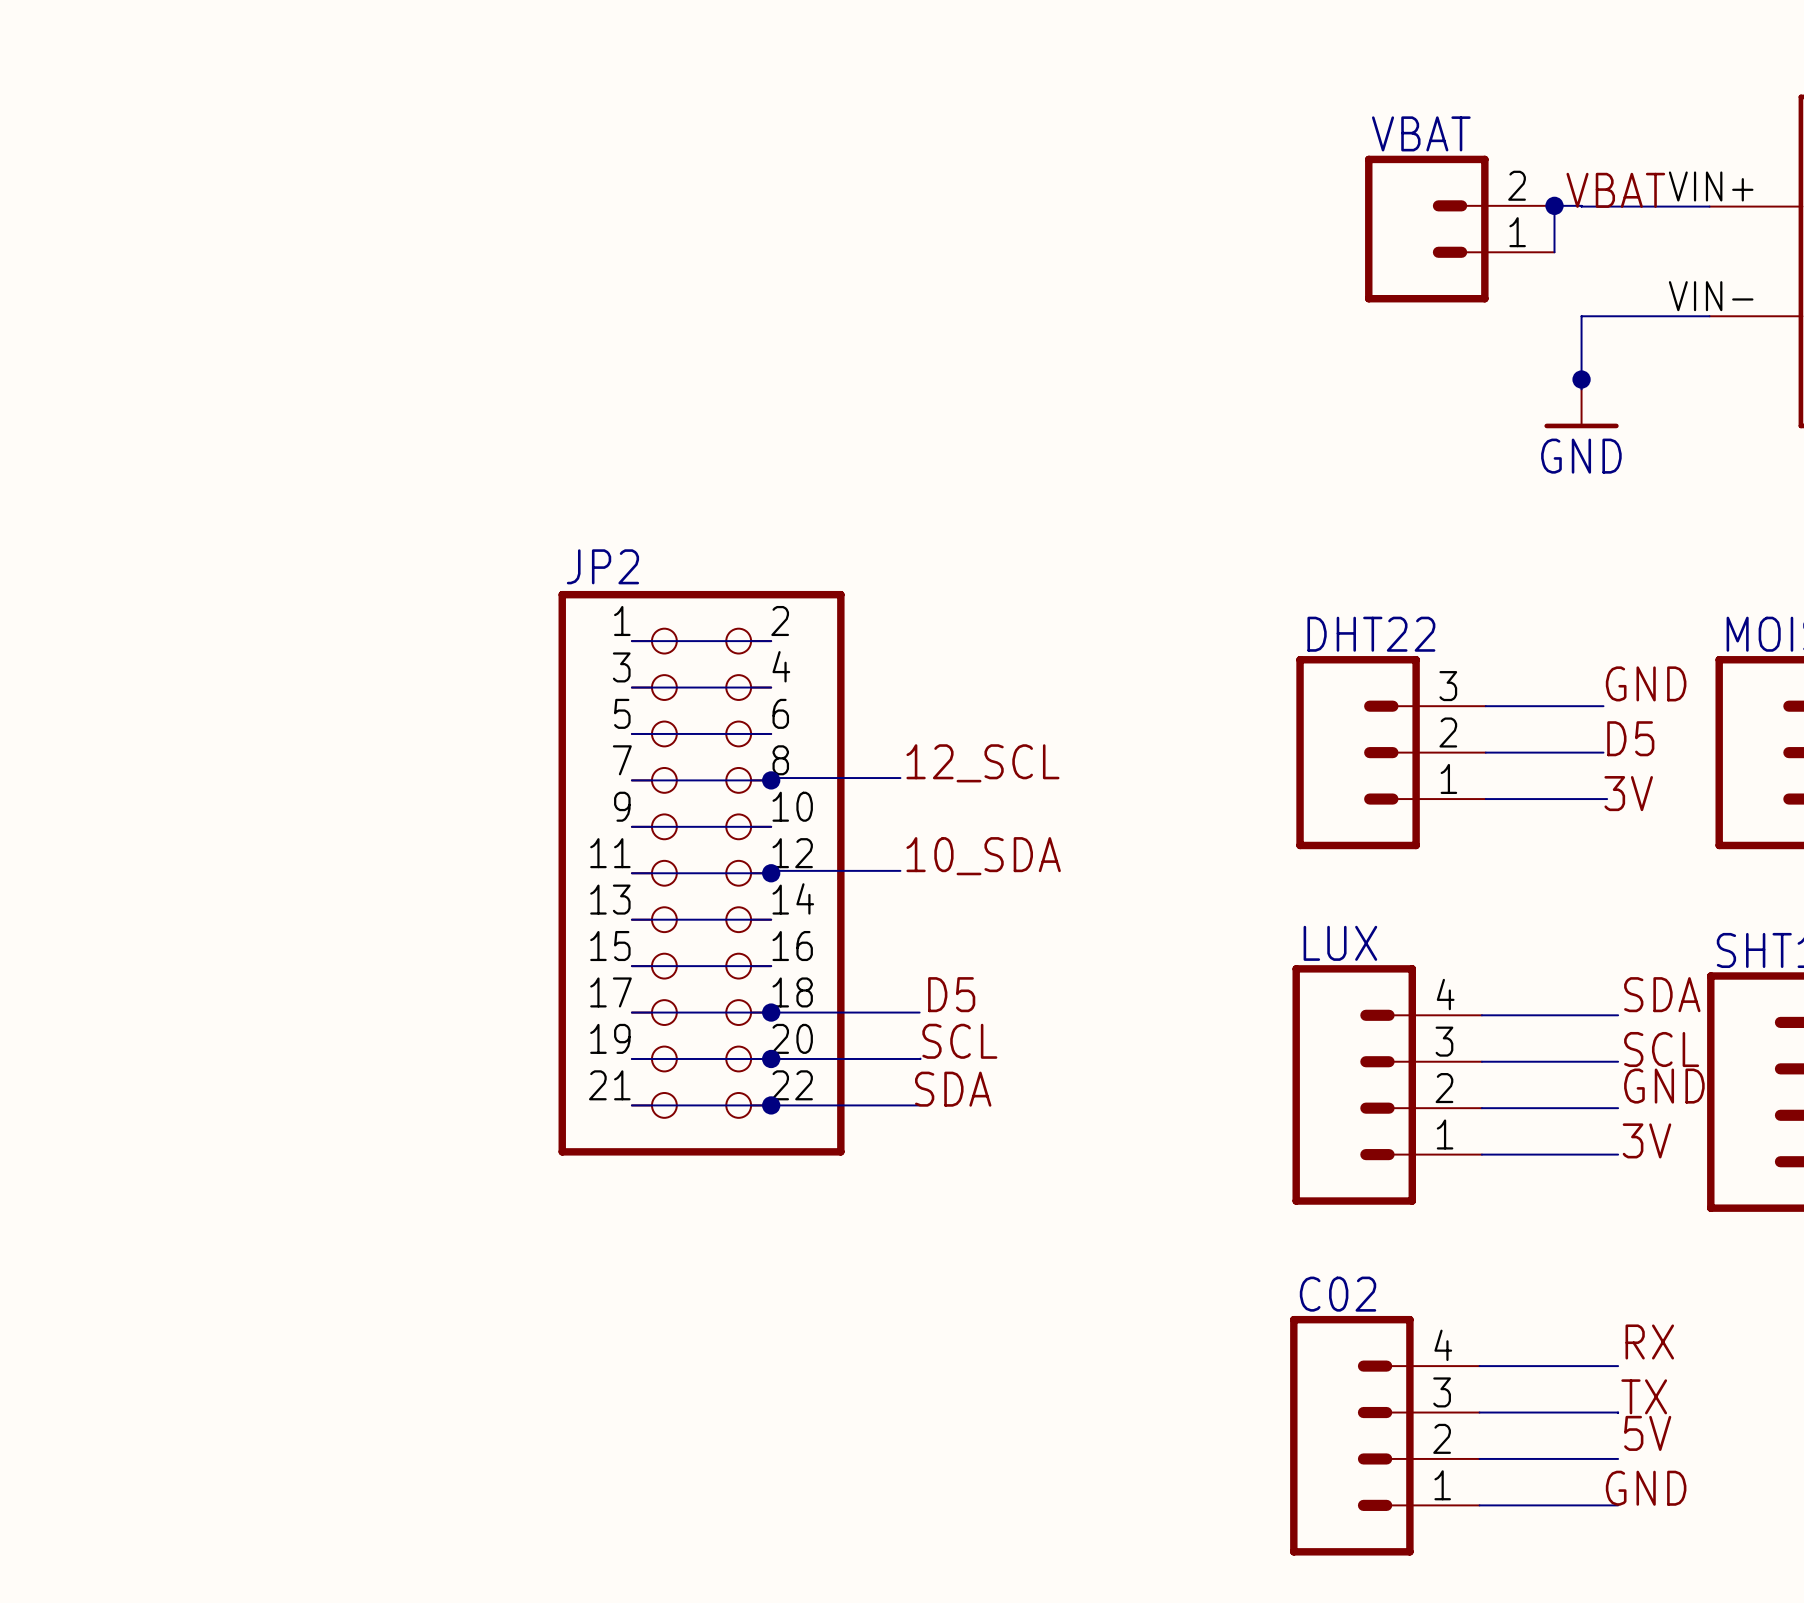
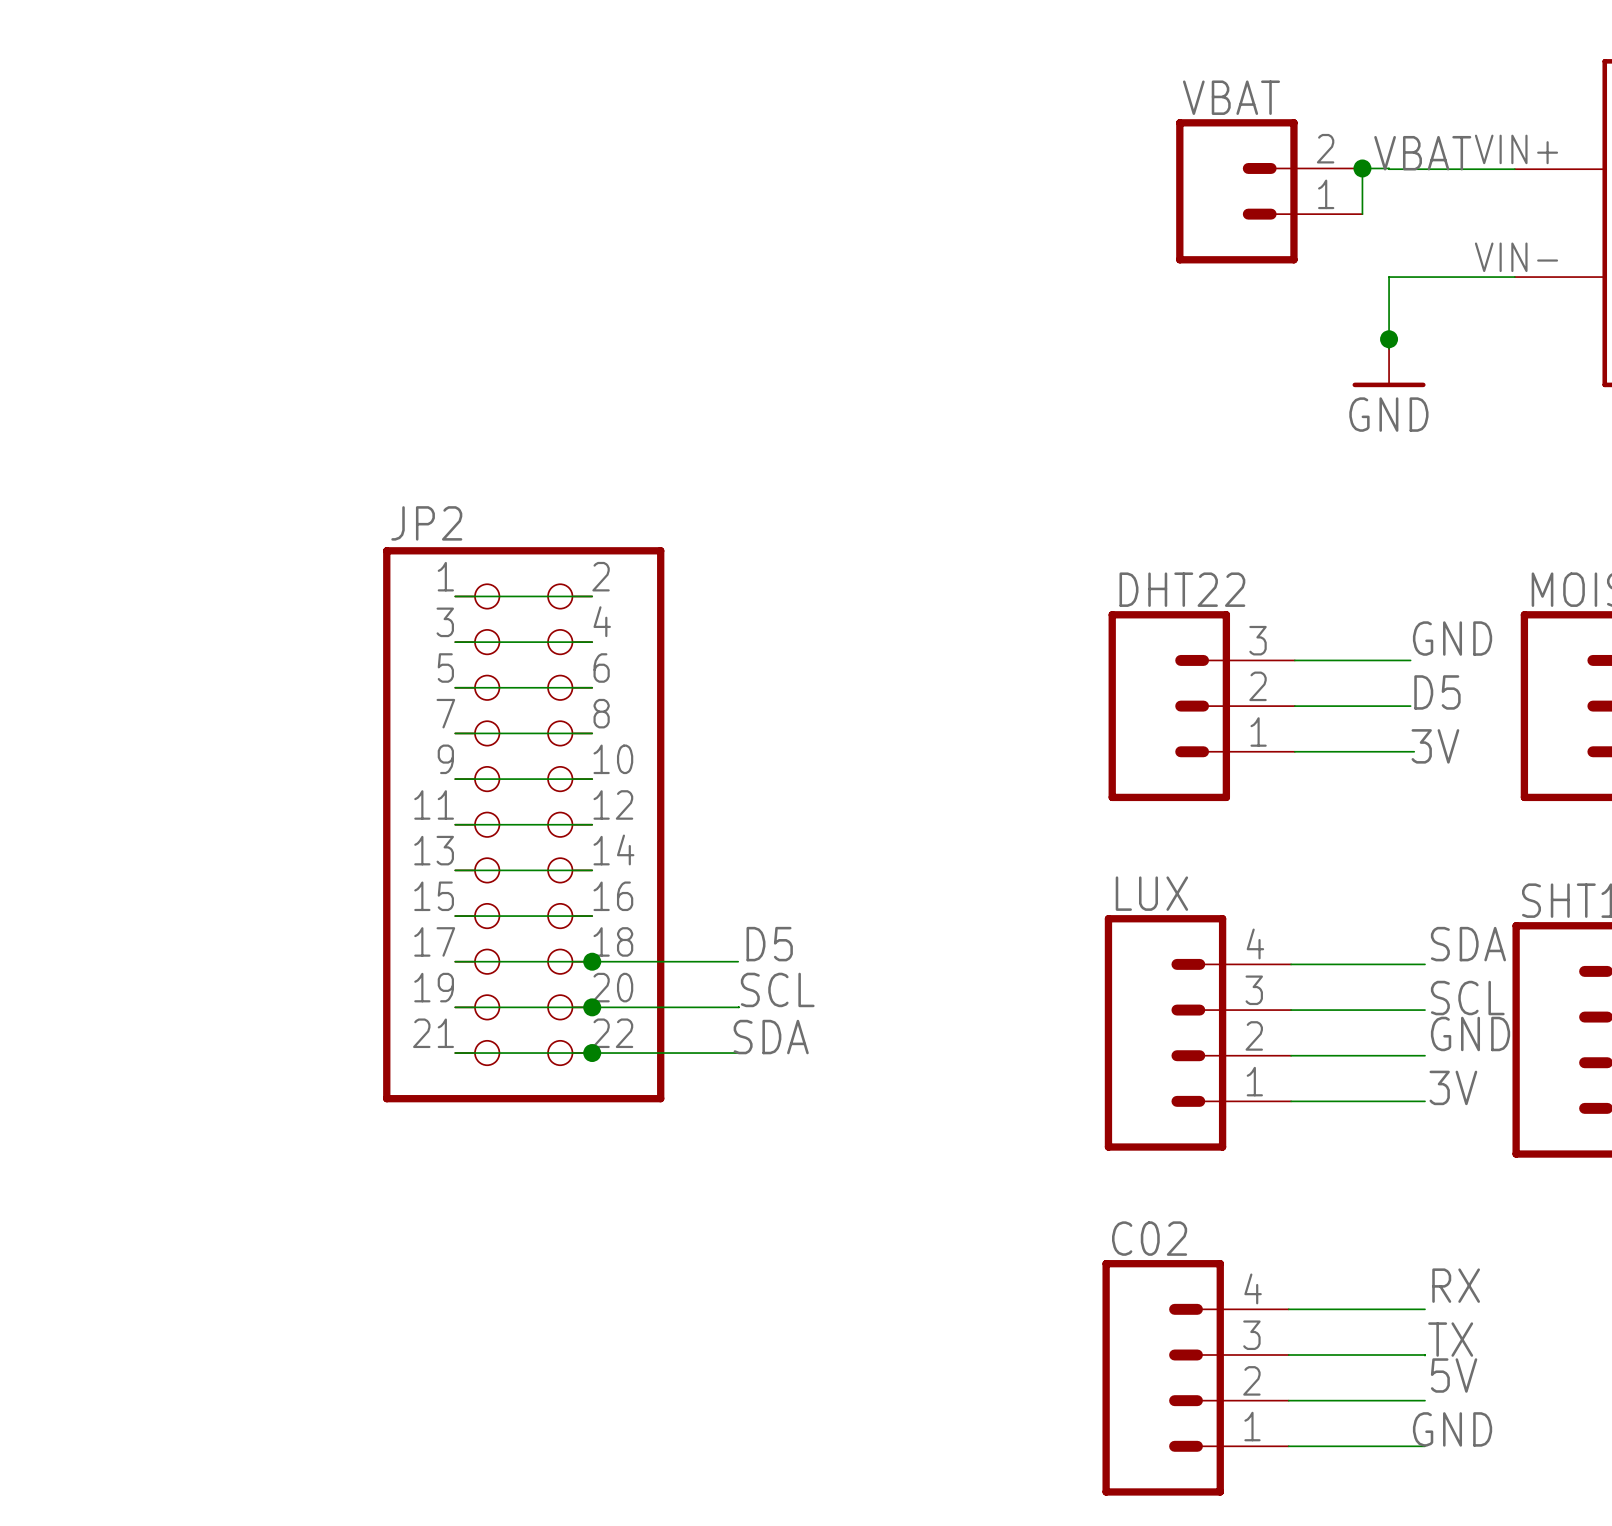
label: 12_SCL (982, 763) -> none
wire: (900, 778) (771, 778) (771, 780) -> none
junction: (771, 780) -> none
label: 10_SDA (983, 856) -> none
wire: (900, 870) (771, 870) (771, 873) -> none
junction: (771, 873) -> none

